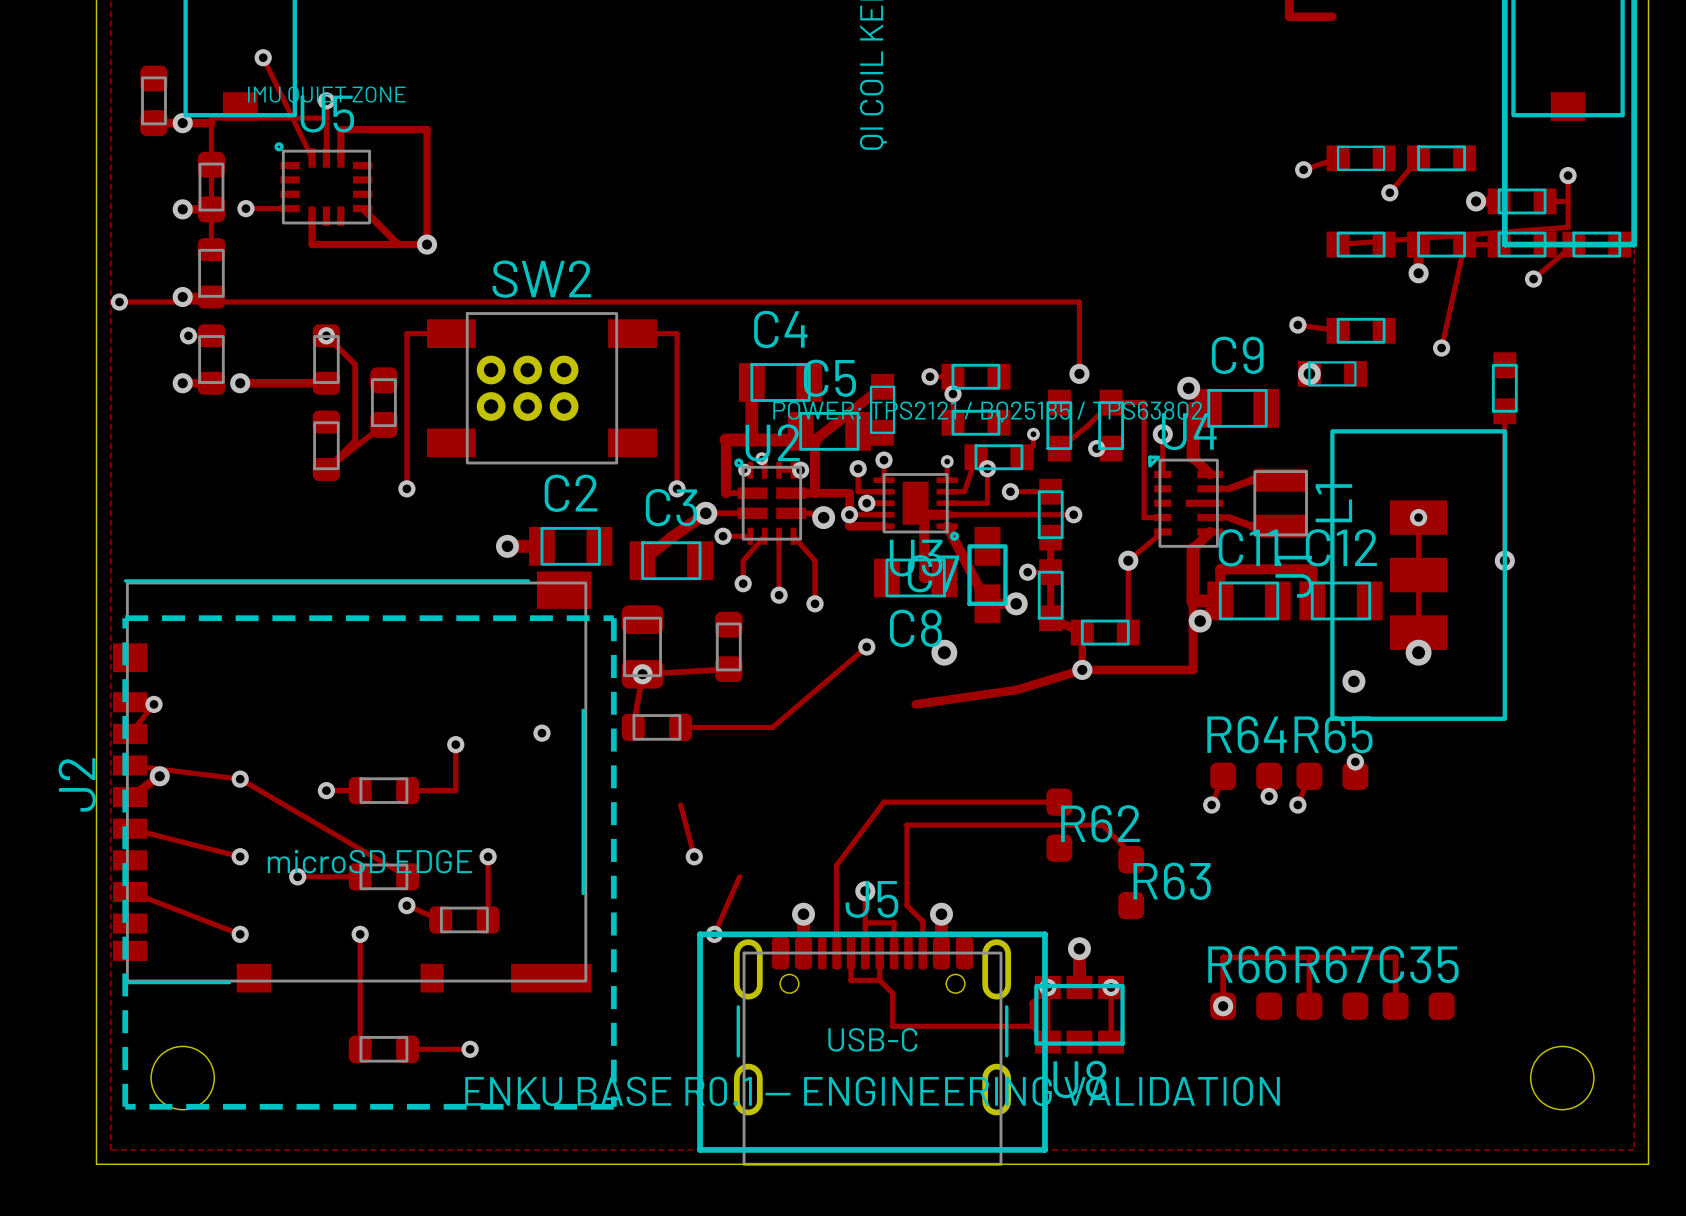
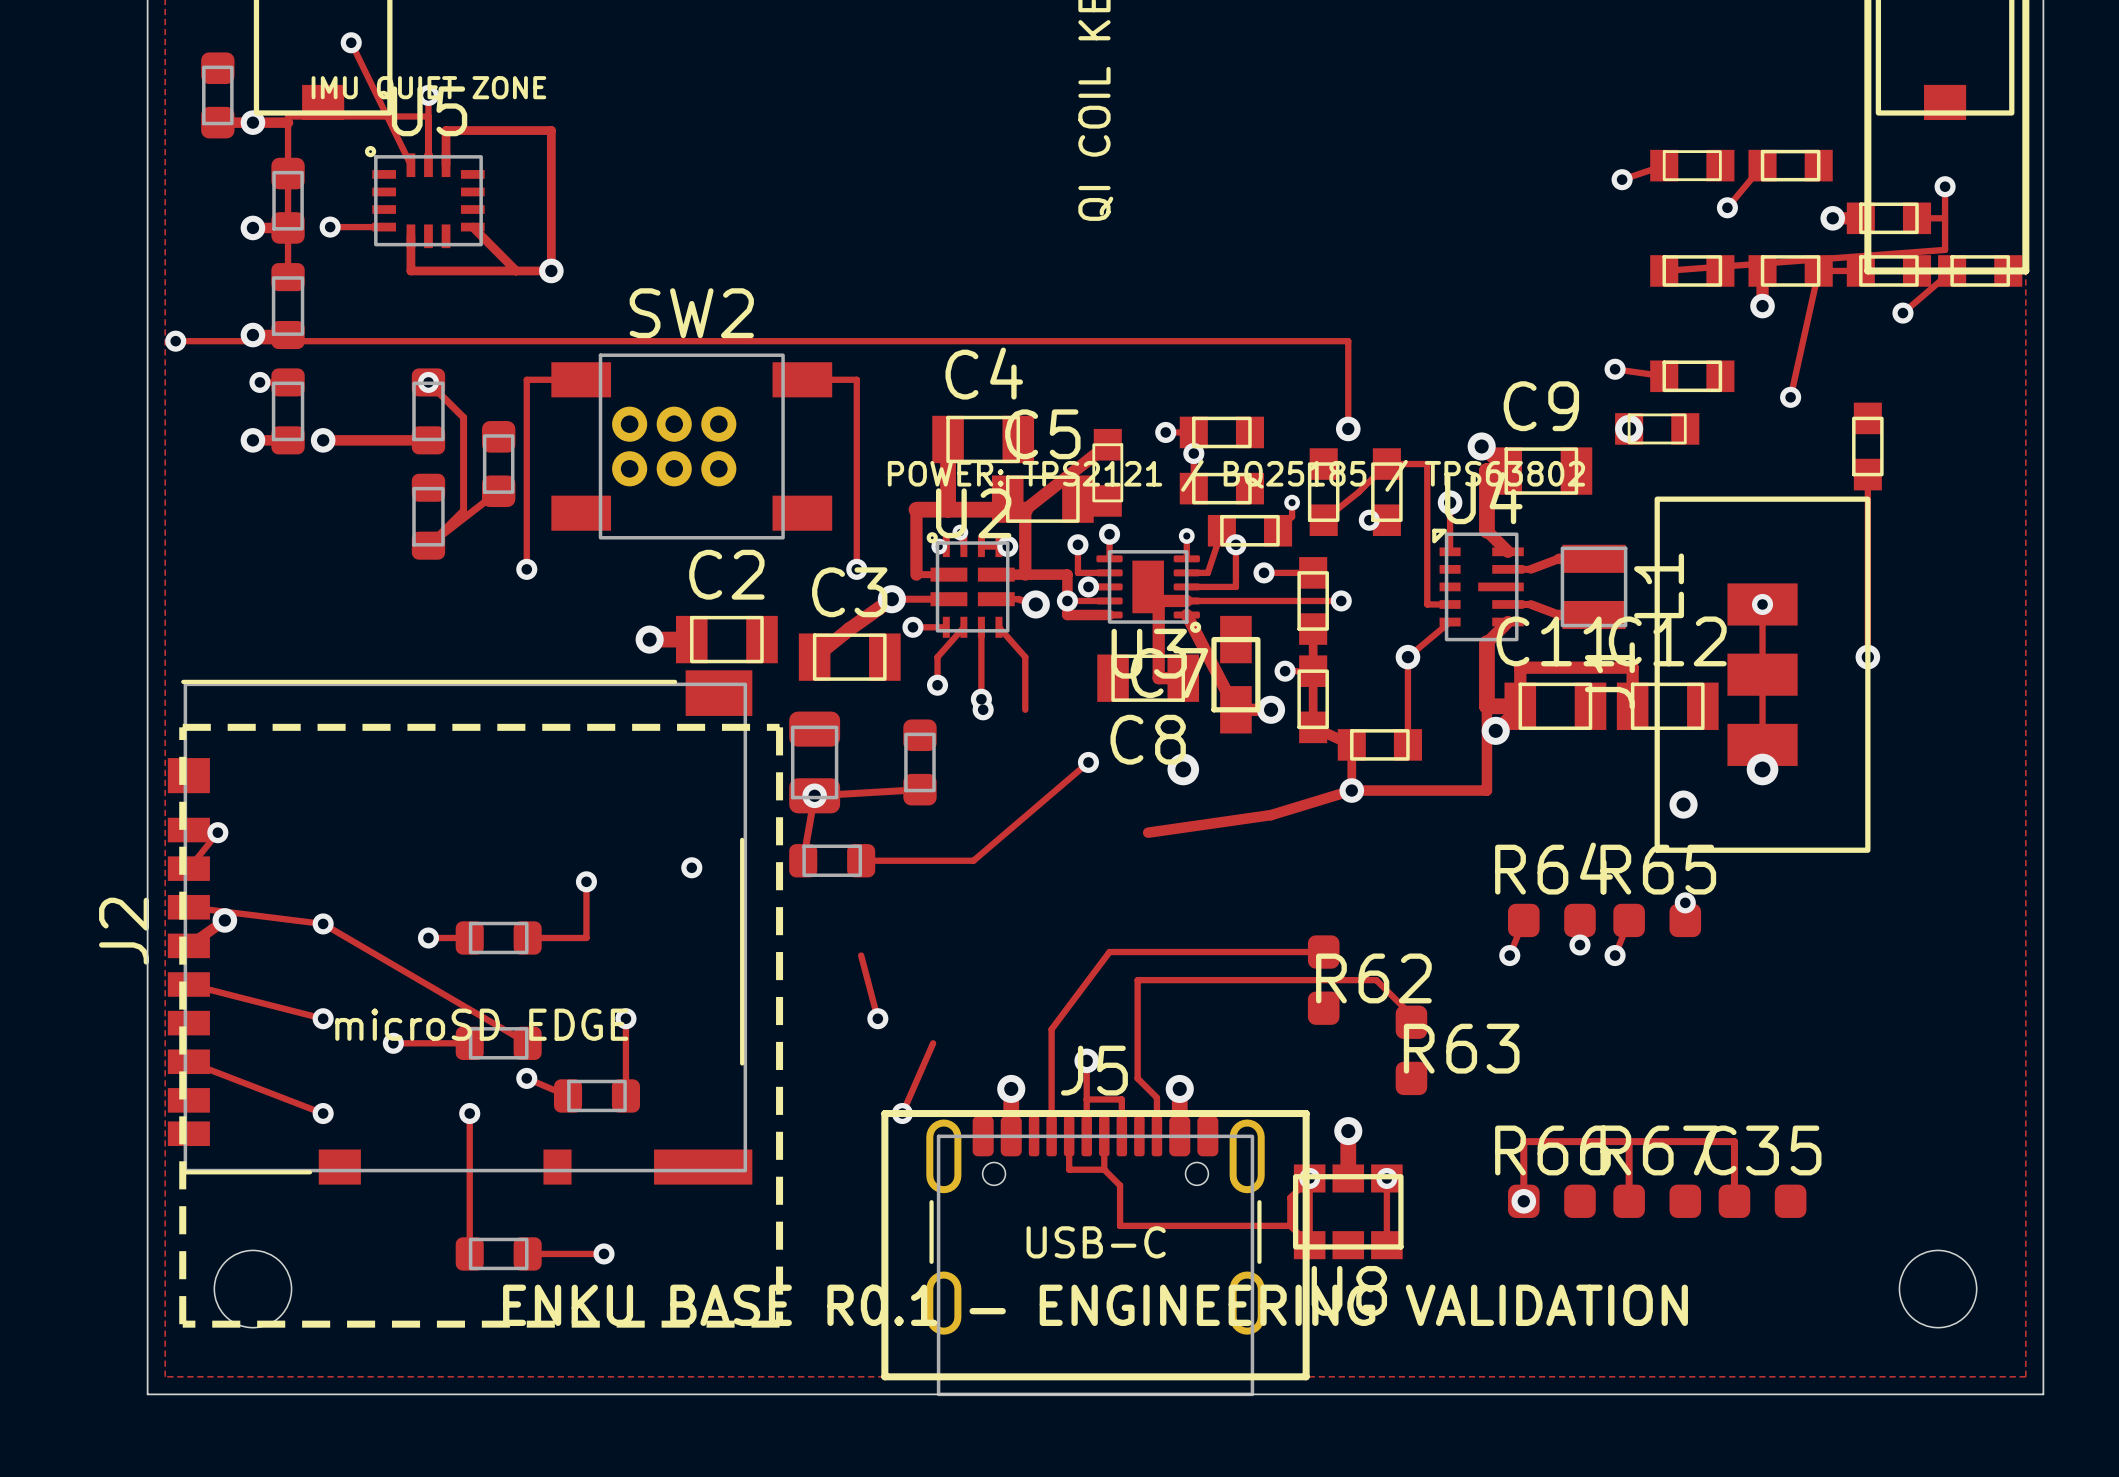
via position: (815, 603) -> (983, 709)

